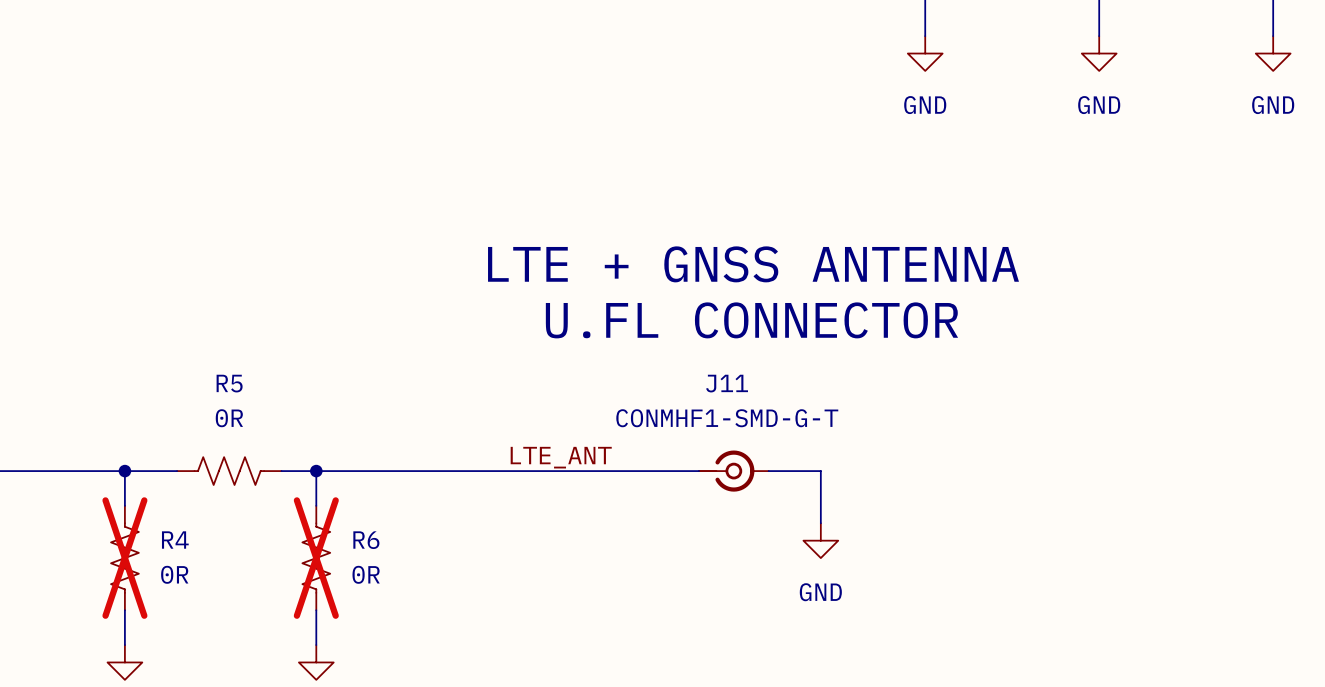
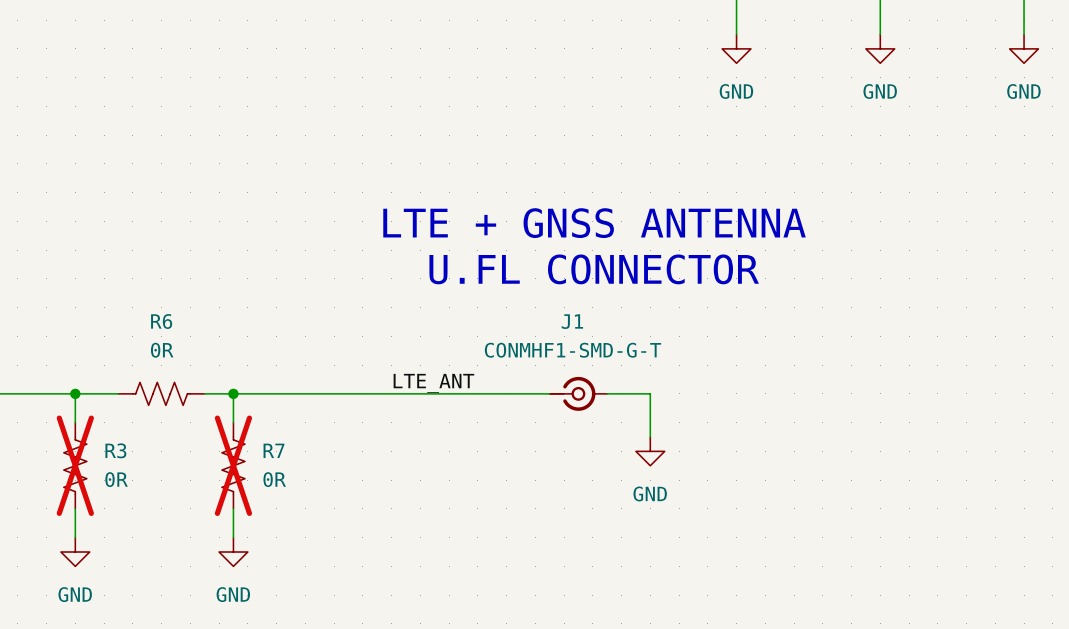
R5 name: R5 (229, 383) -> R6 (161, 321)
J11 name: J11 (727, 383) -> J1 (572, 321)
R4 name: R4 (175, 540) -> R3 (115, 450)
R6 name: R6 (366, 540) -> R7 (274, 450)

